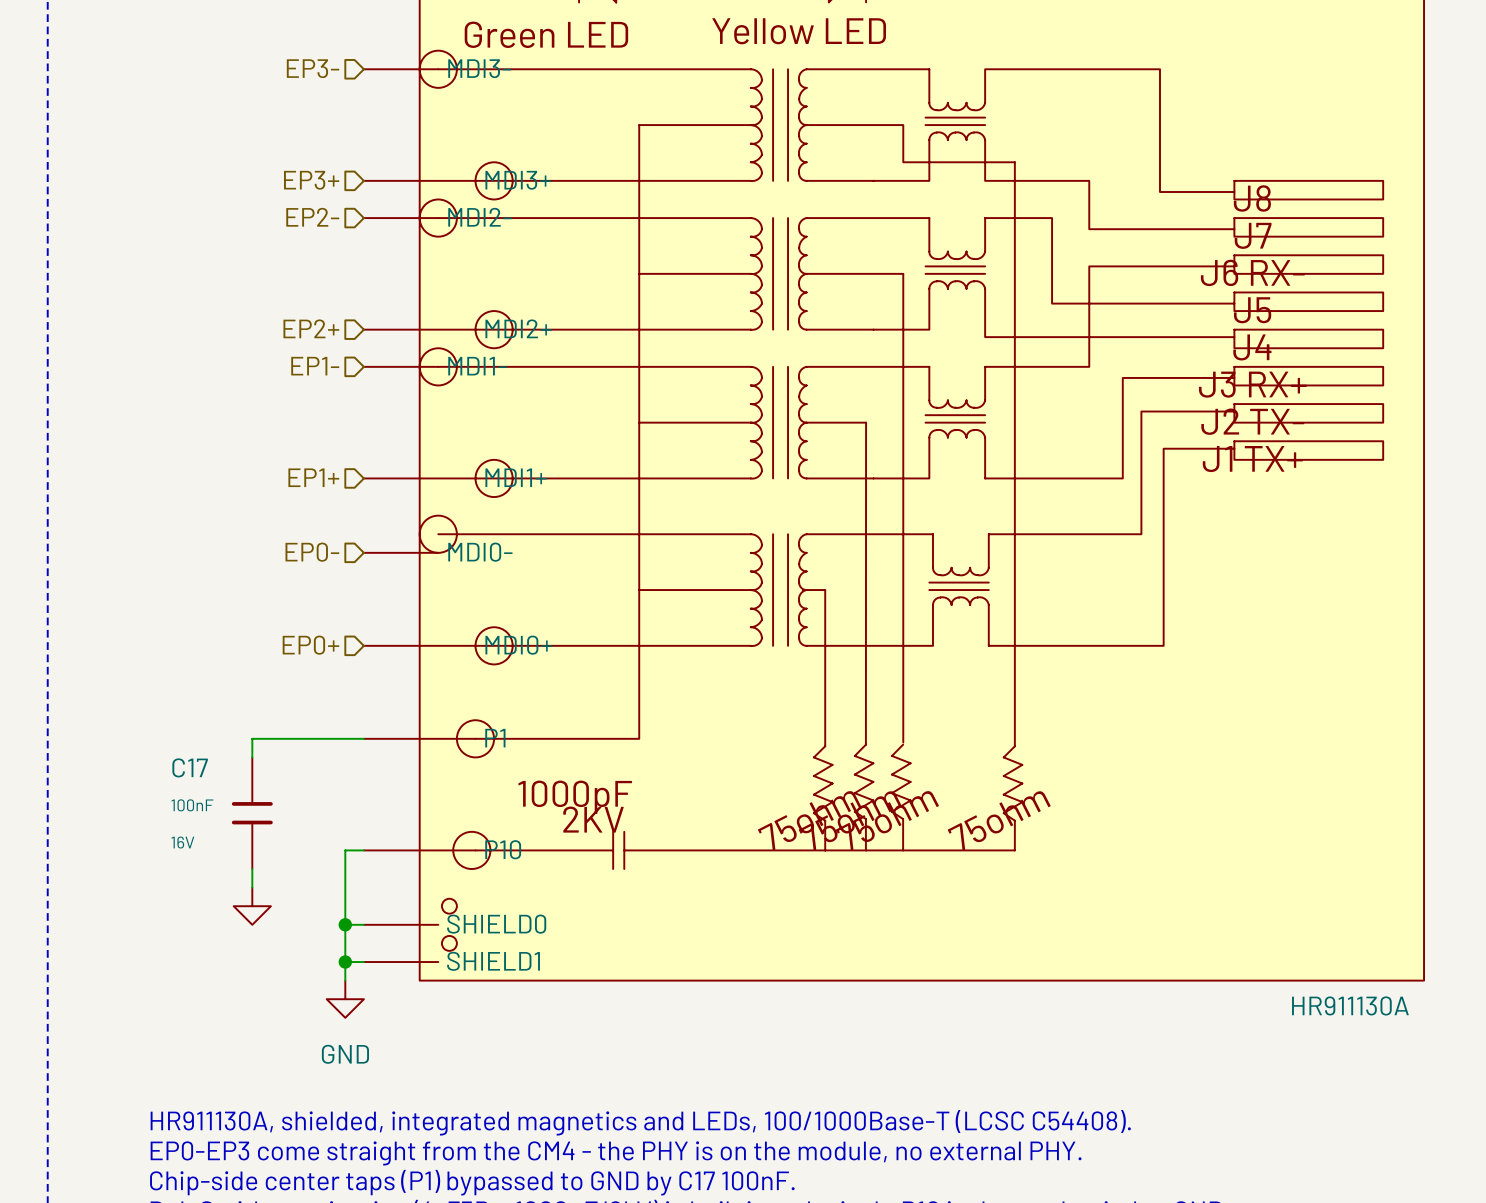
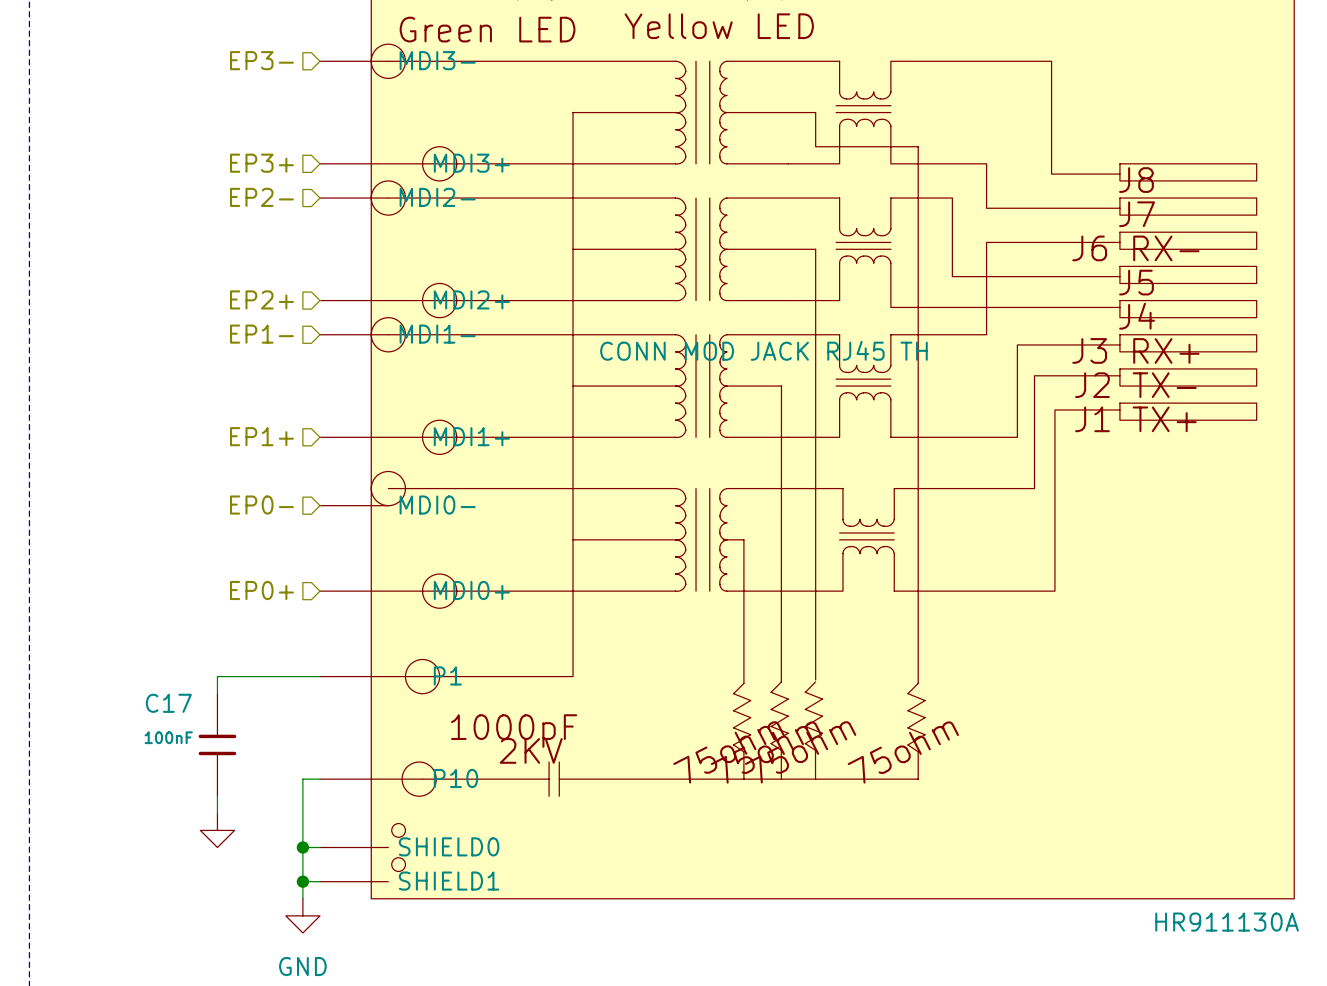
part text: none -> CONN MOD JACK RJ45 TH (763, 350)
C17 text: 16V (182, 842) -> none

